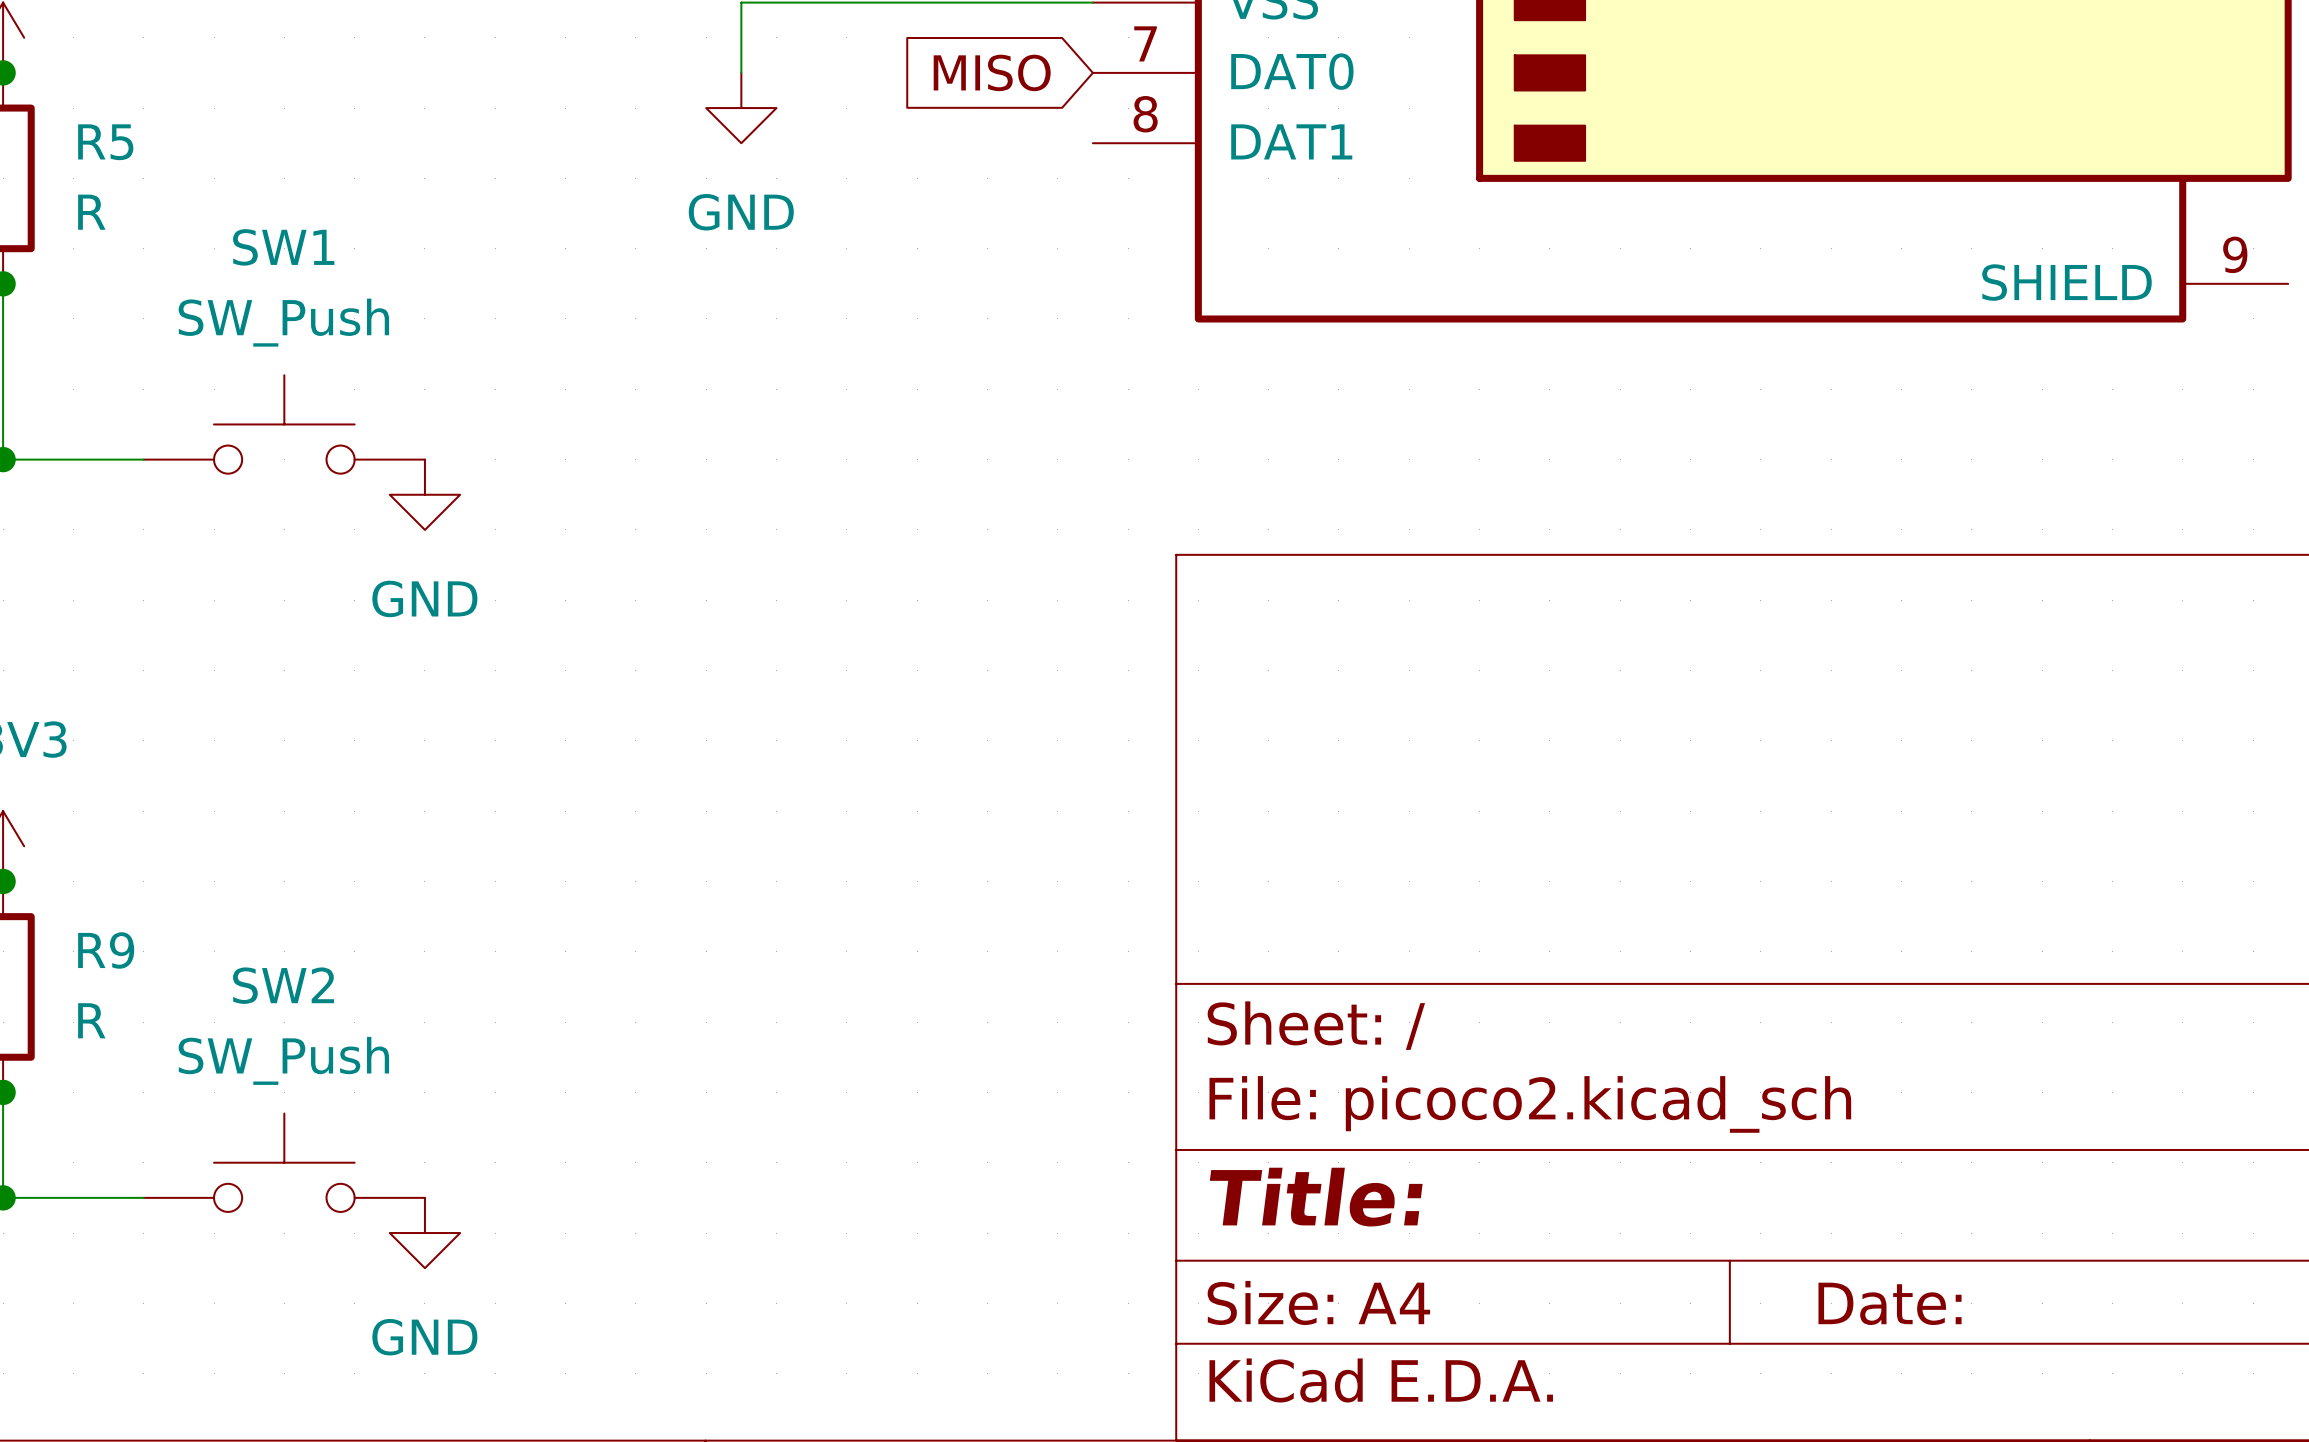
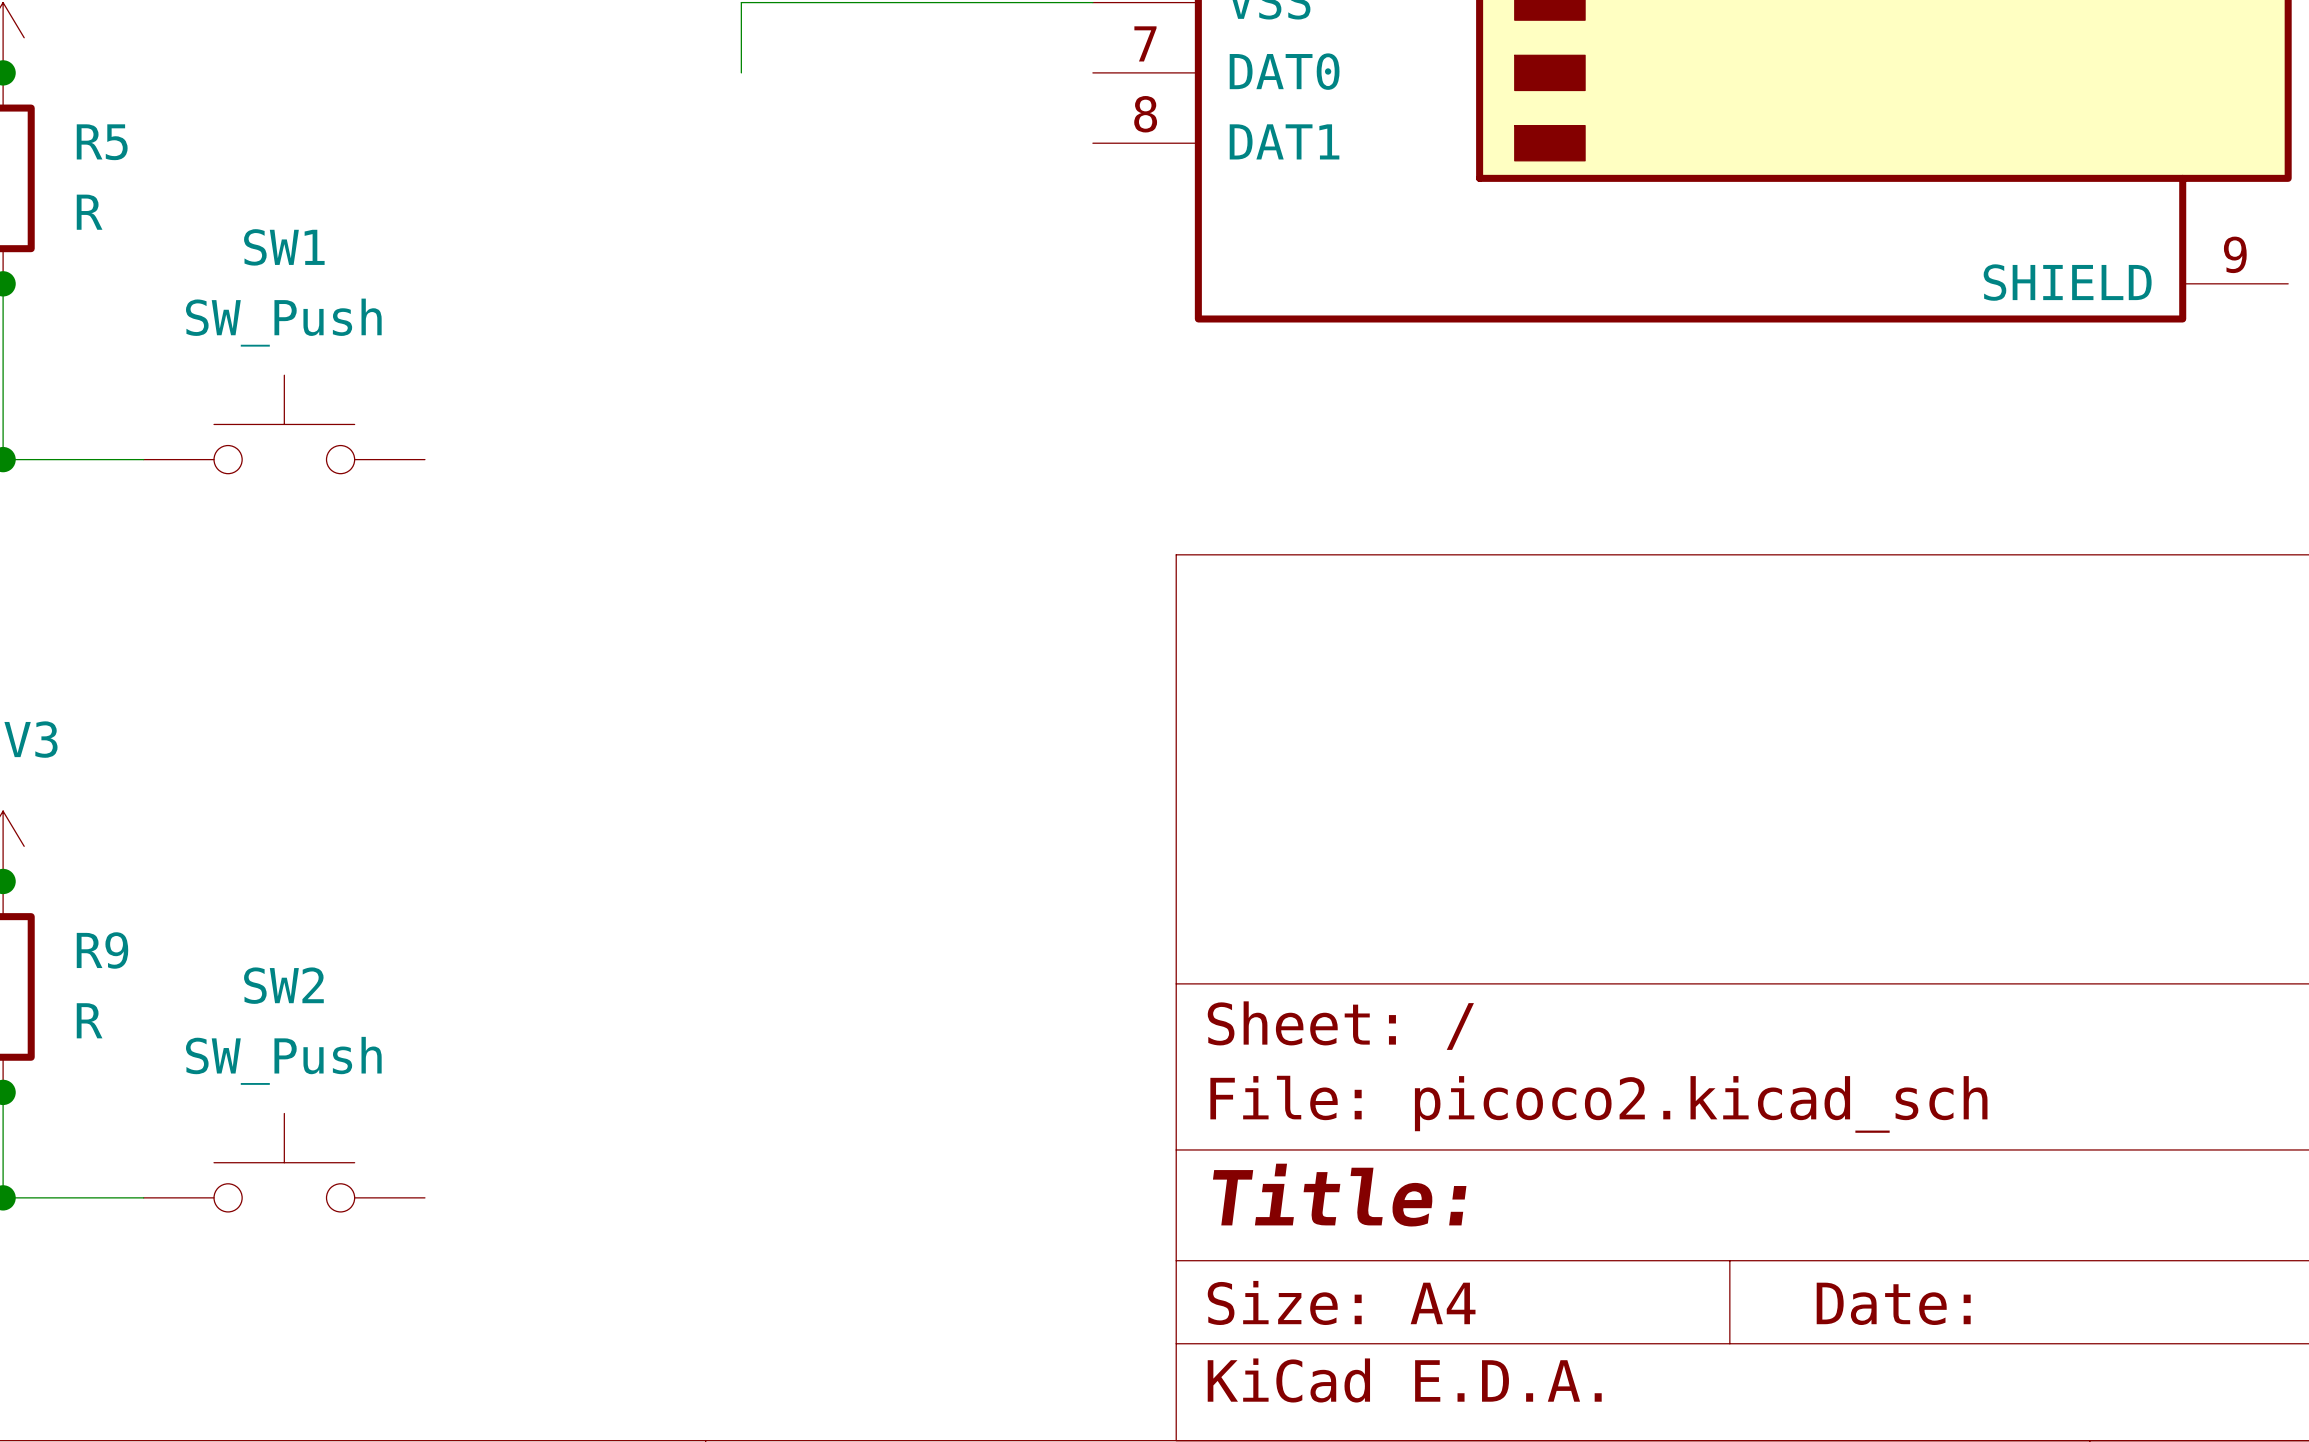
global label: MISO (992, 72) -> none
power symbol: GND (741, 108) -> none
power symbol: GND (424, 494) -> none
power symbol: GND (424, 1233) -> none

